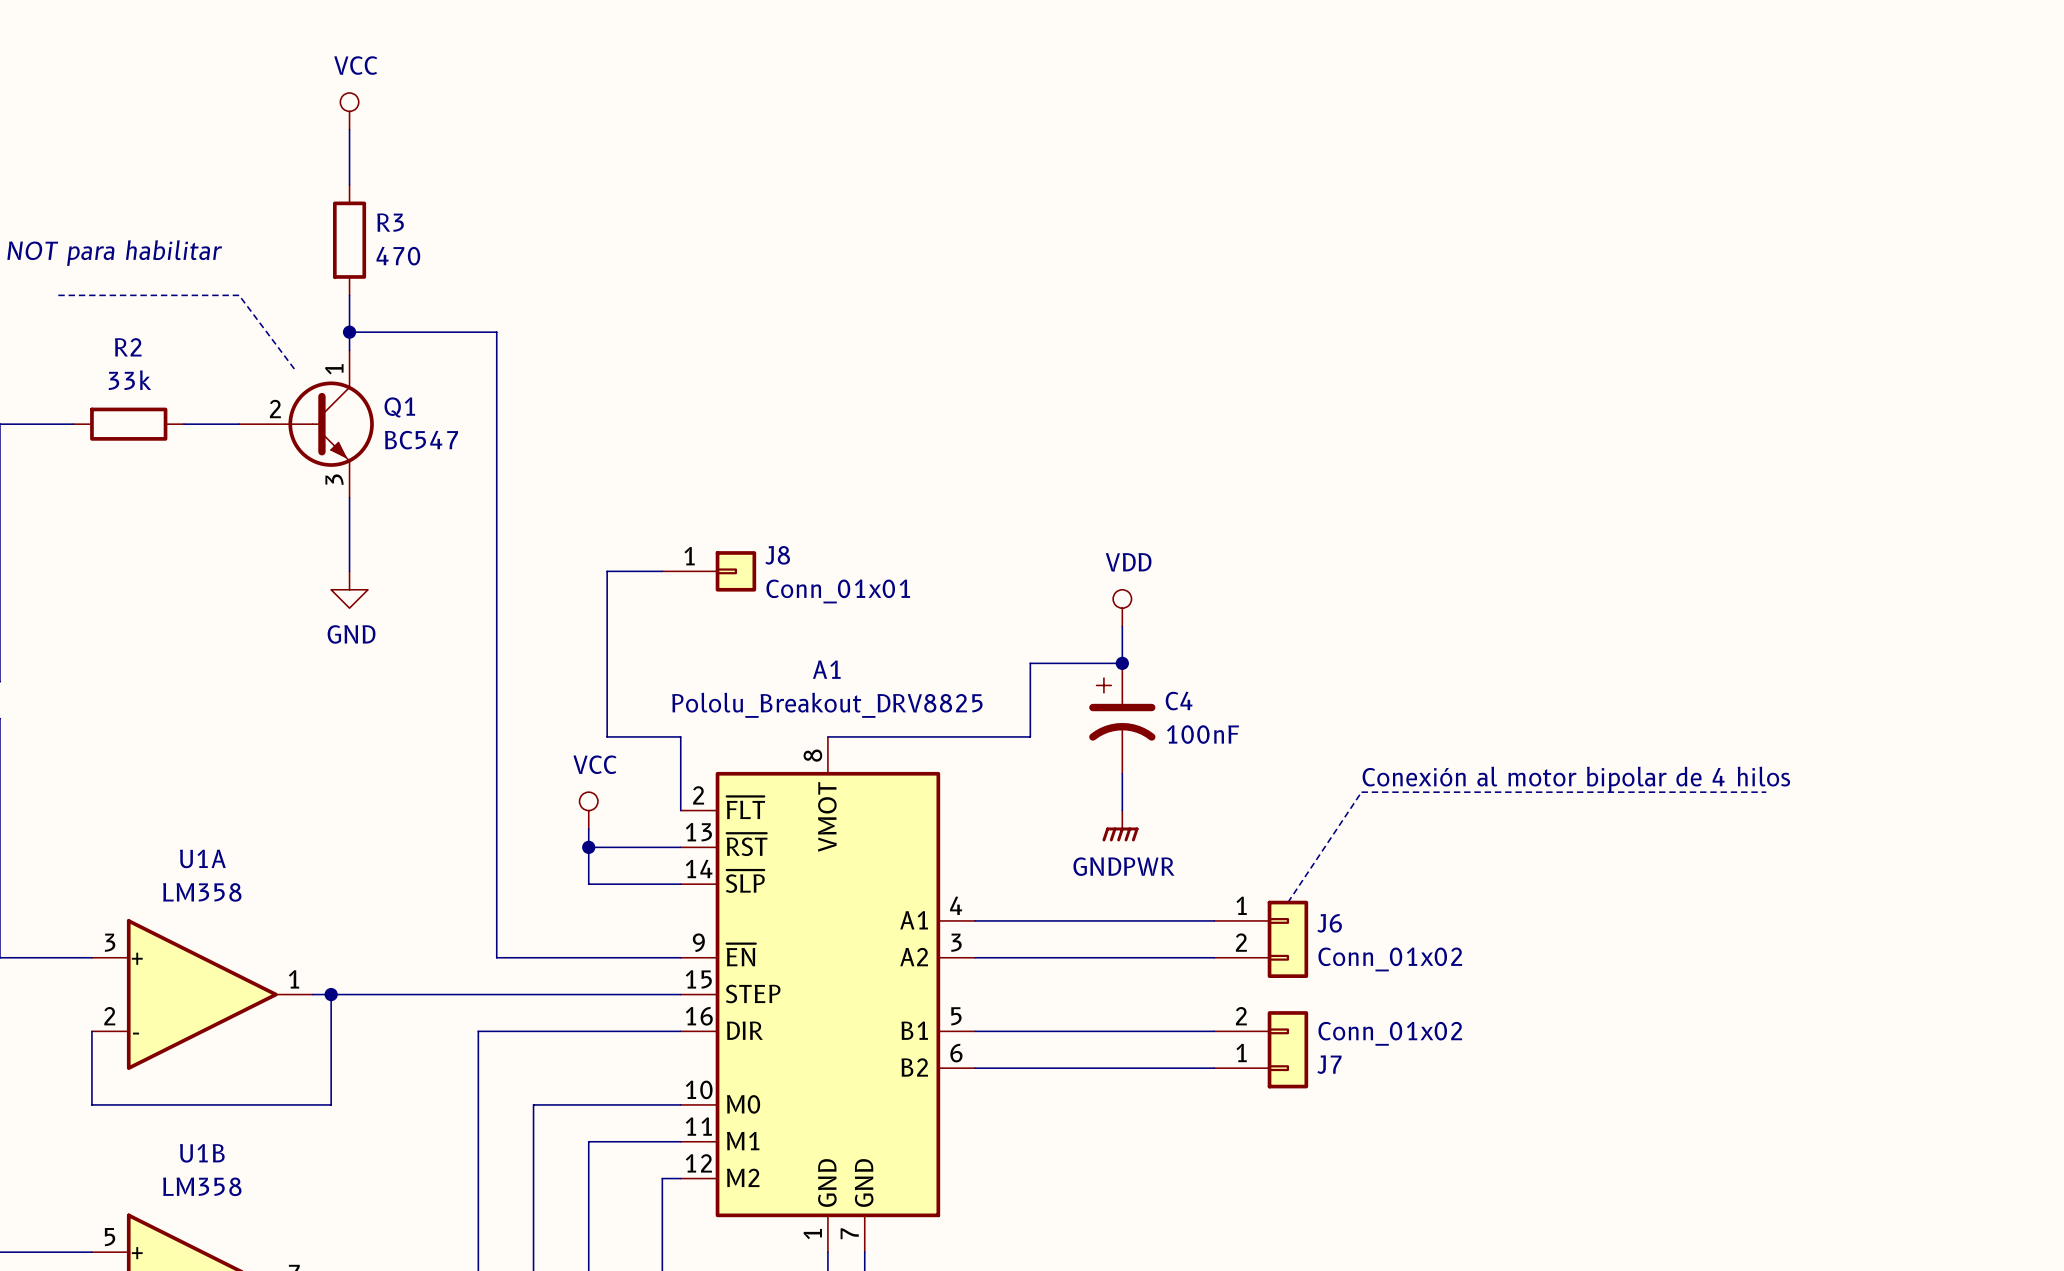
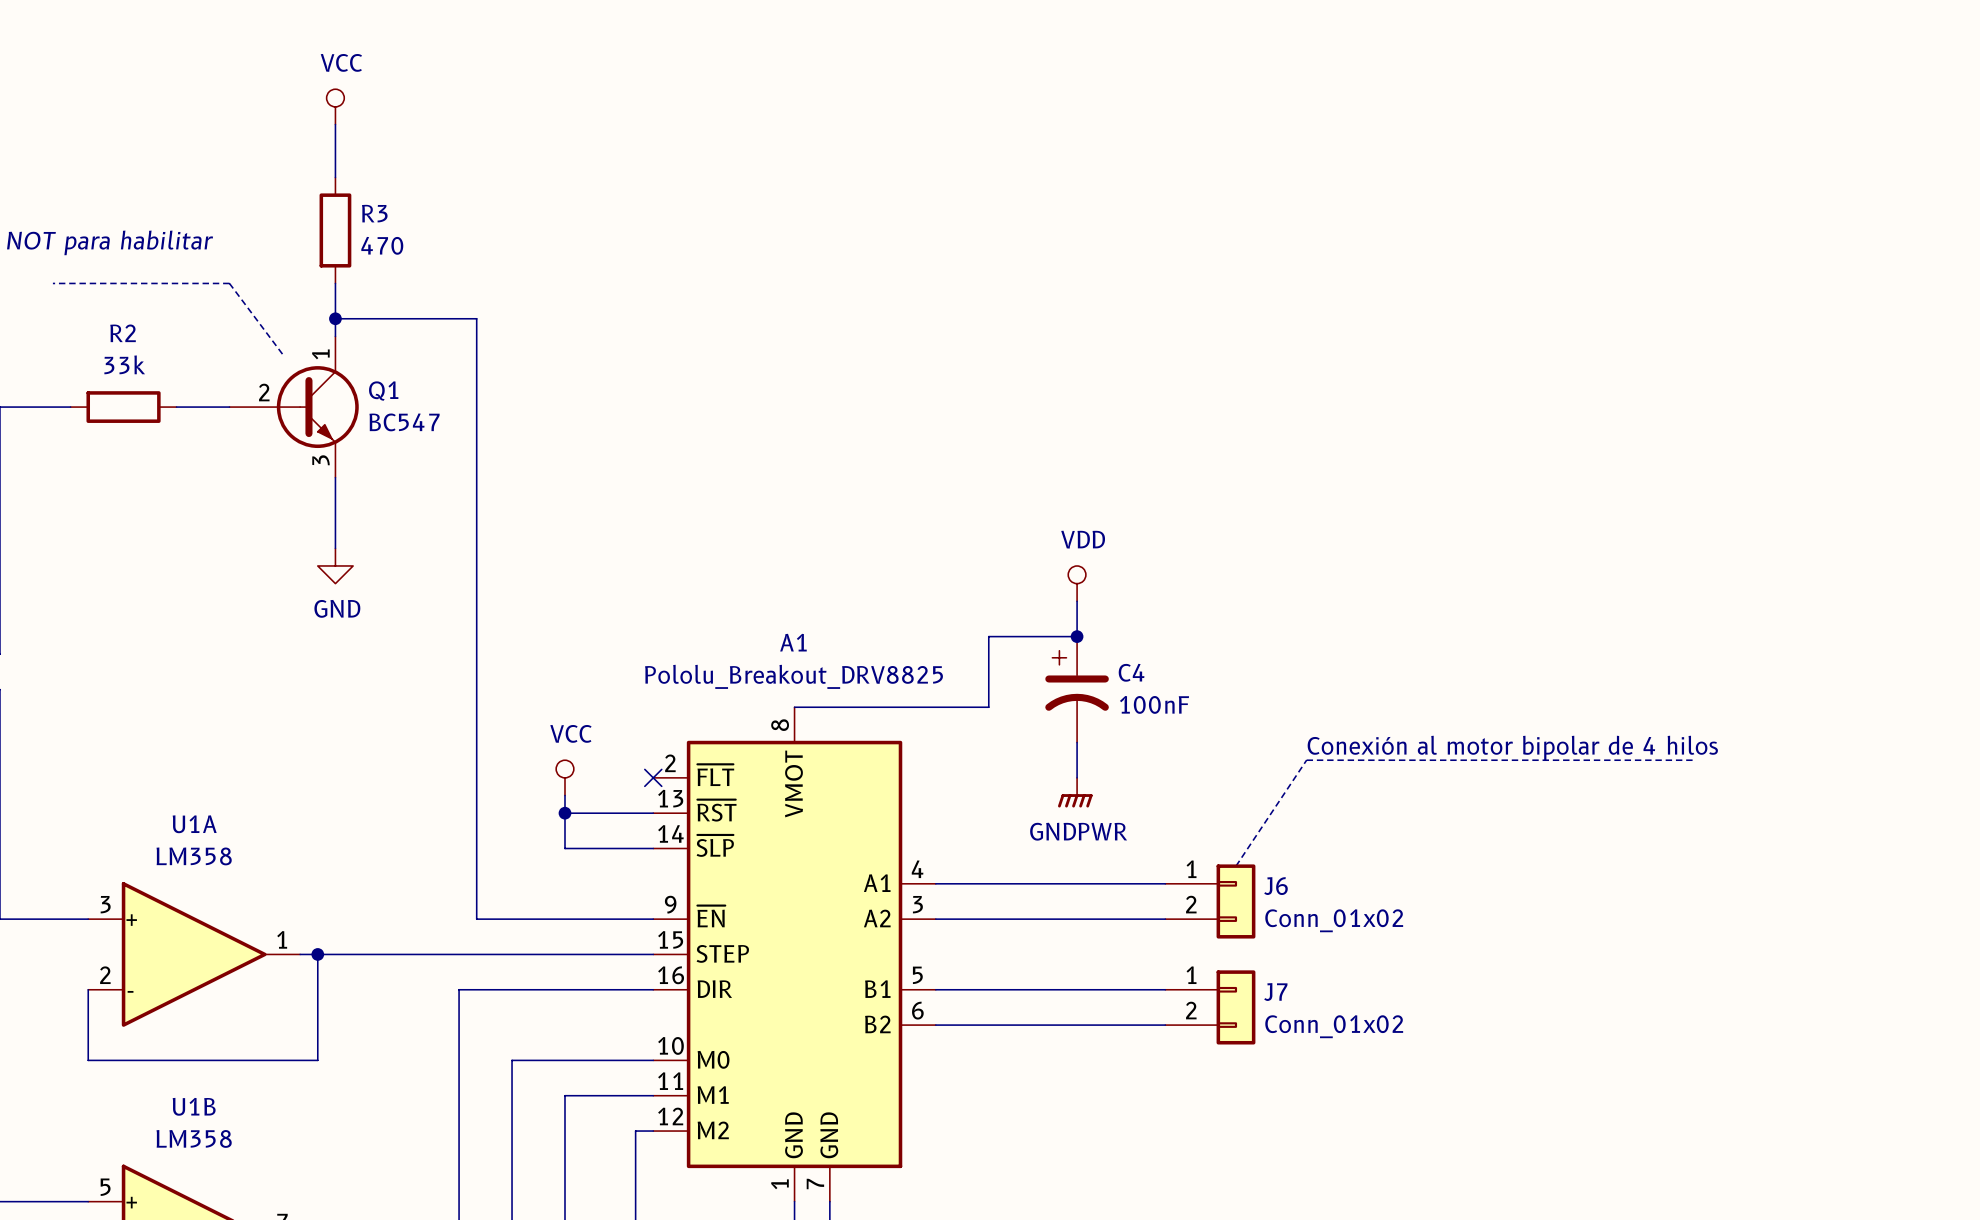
wire: (662, 571) (607, 571) (607, 736) (680, 736) (680, 810) -> none
J8: Conn_01x01 (709, 571) -> none
no-connect mark: none -> (653, 777)
J7 flip: as is (1287, 1049) -> up-down (1235, 1007)

